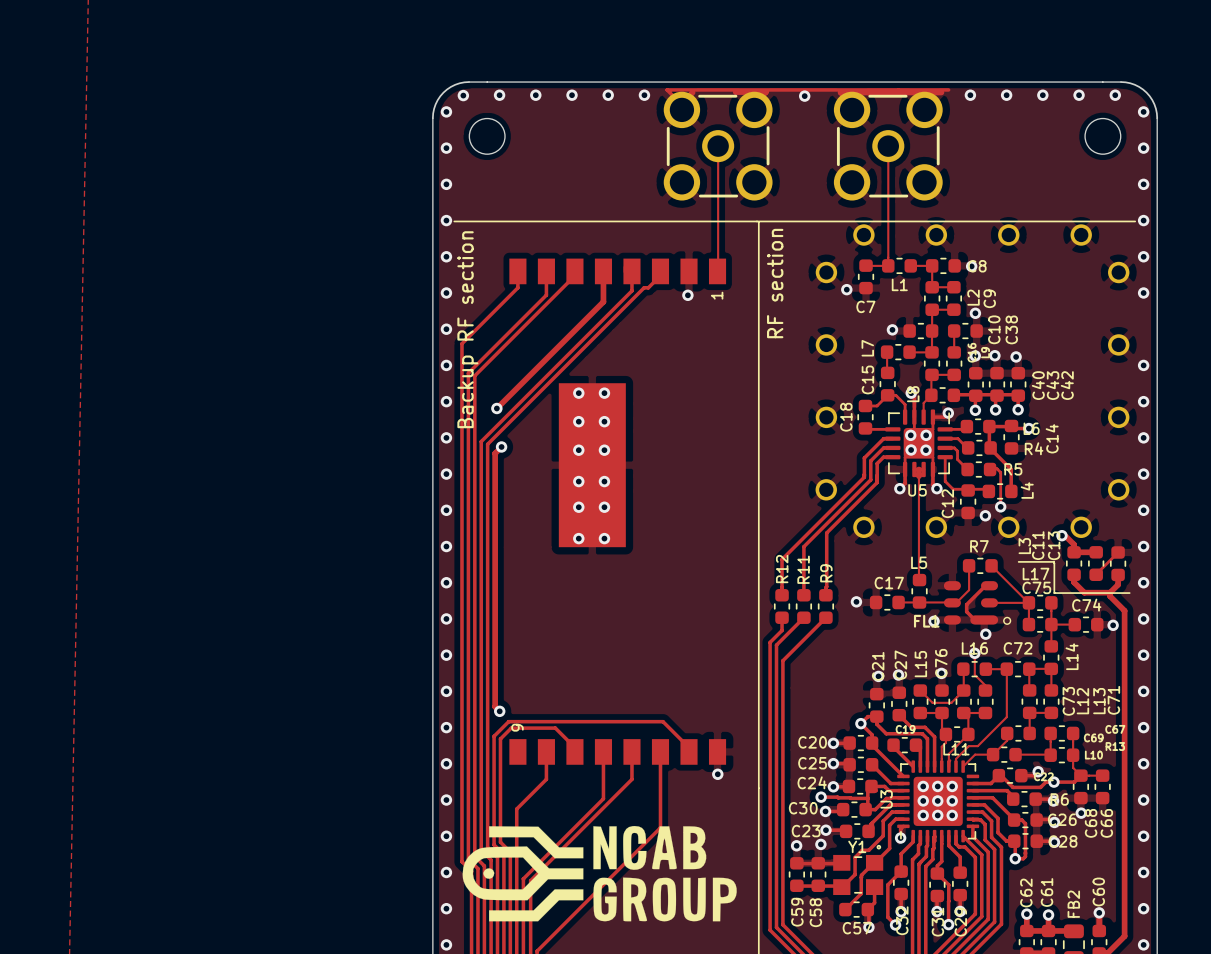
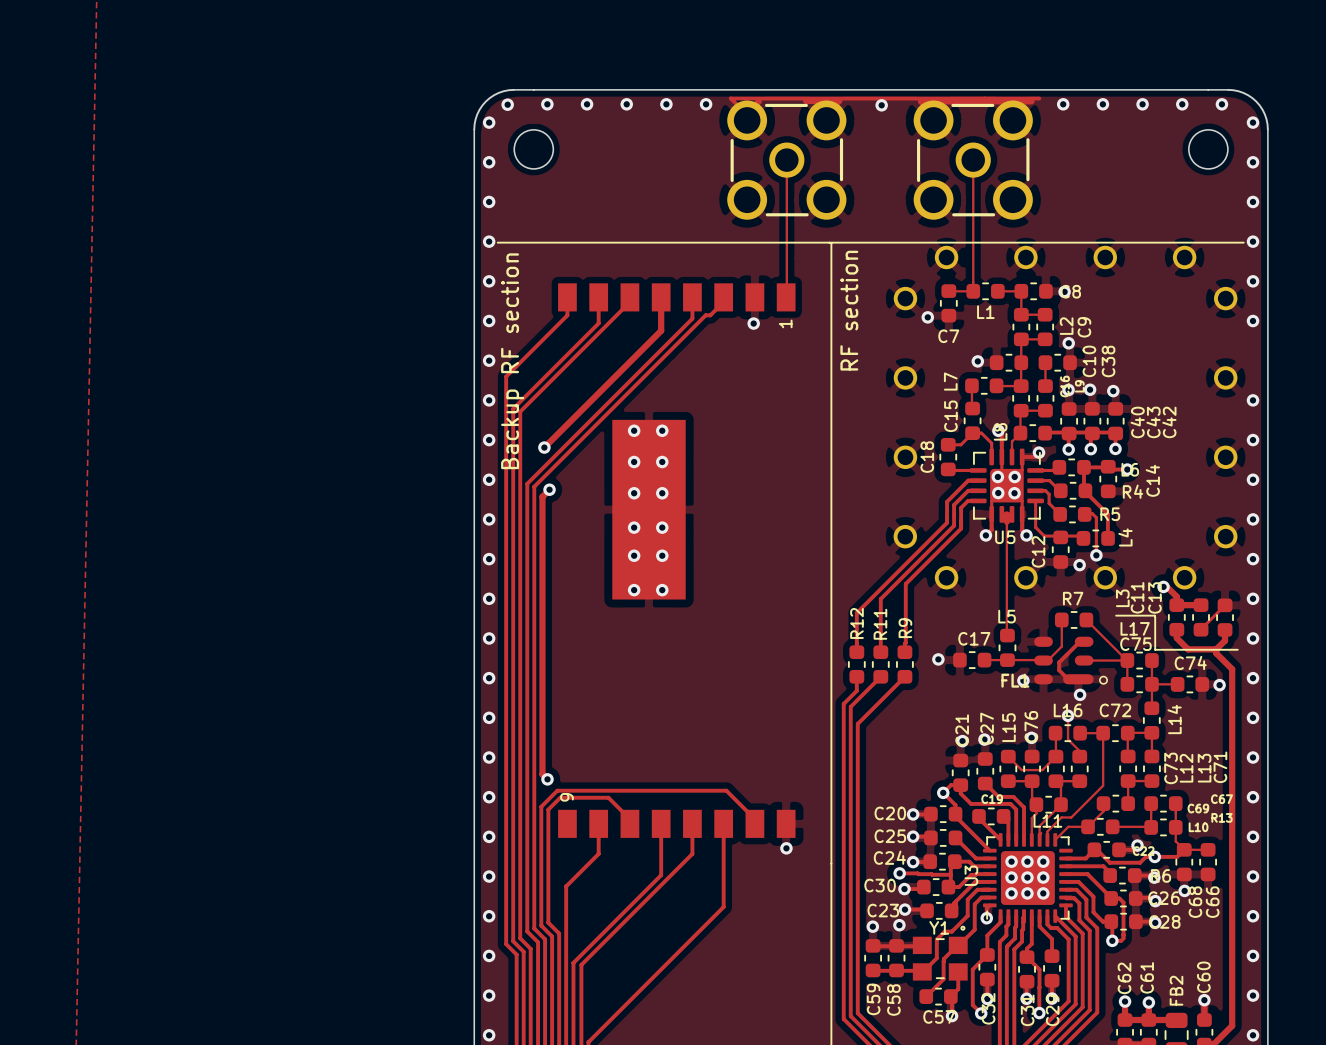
drawing: [462, 825, 737, 922] -> none

